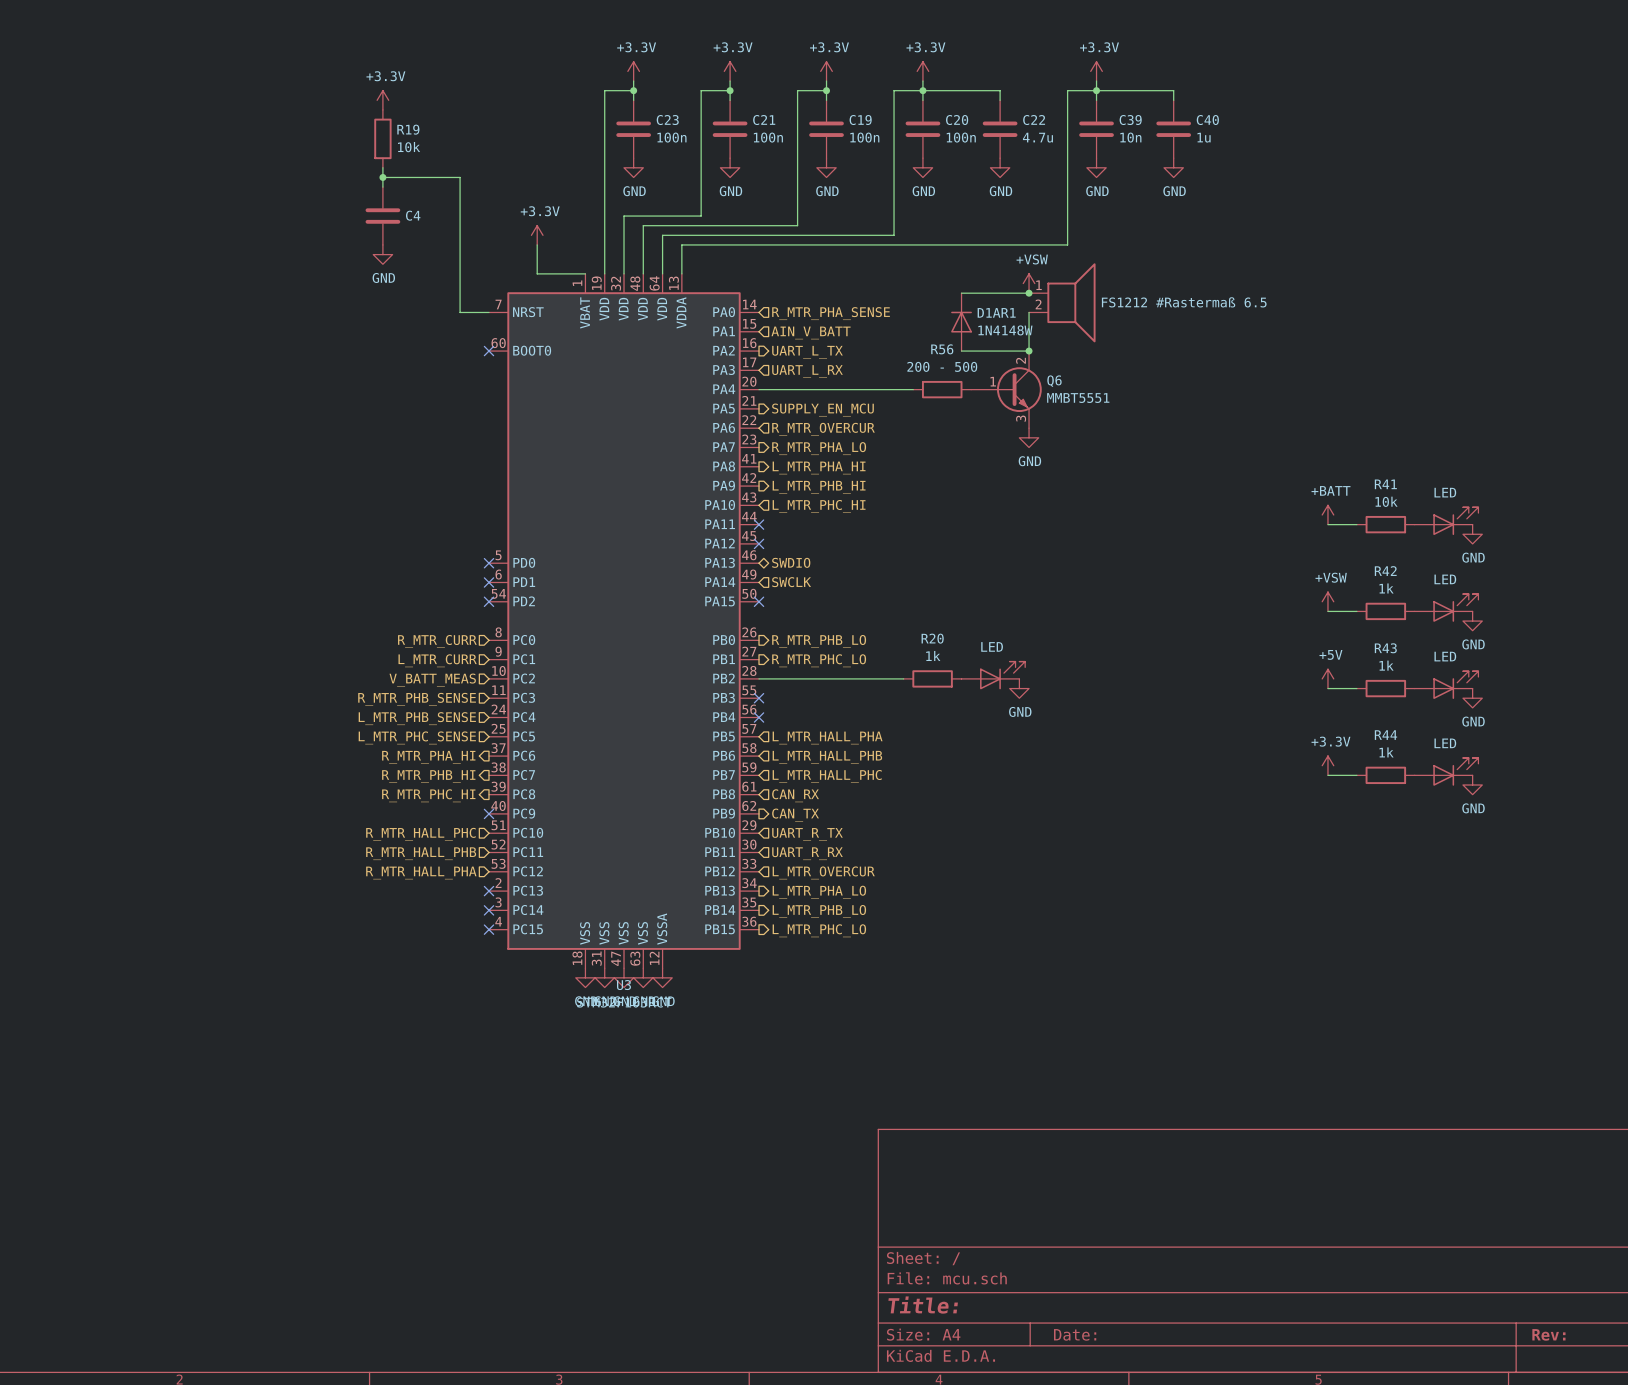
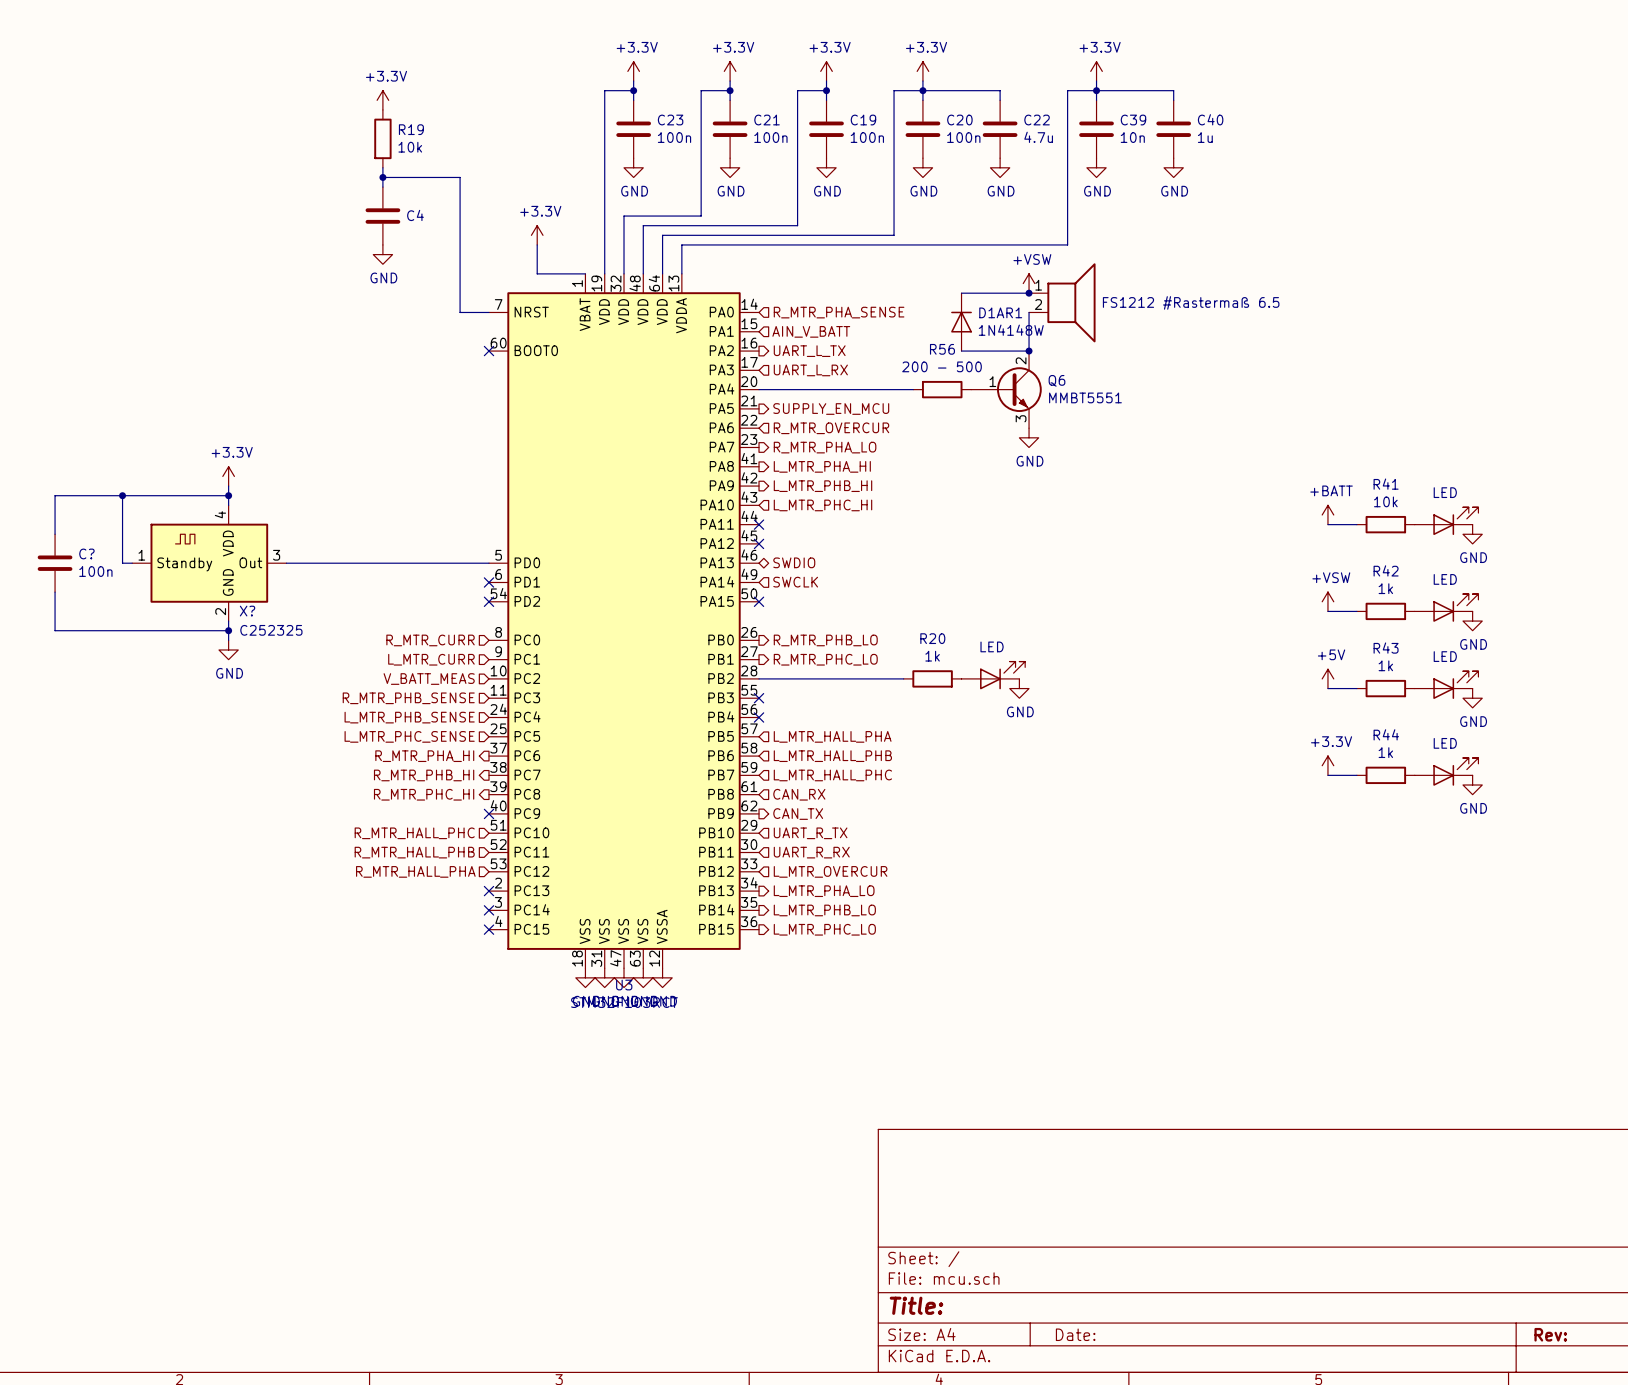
power symbol: none -> +3.3V (228, 476)
wire: none -> (228, 486) (228, 505)
wire: none -> (122, 495) (122, 563) (132, 563)
junction: none -> (122, 495)
wire: none -> (228, 495) (55, 495) (55, 534)
junction: none -> (228, 495)
C?: none -> 100n (55, 563)
X?: none -> C252325 (209, 563)
wire: none -> (286, 563) (488, 563)
no-connect mark: (488, 563) -> none
wire: none -> (55, 592) (55, 630) (228, 630)
wire: none -> (228, 621) (228, 640)
junction: none -> (228, 630)
power symbol: none -> GND (228, 649)

